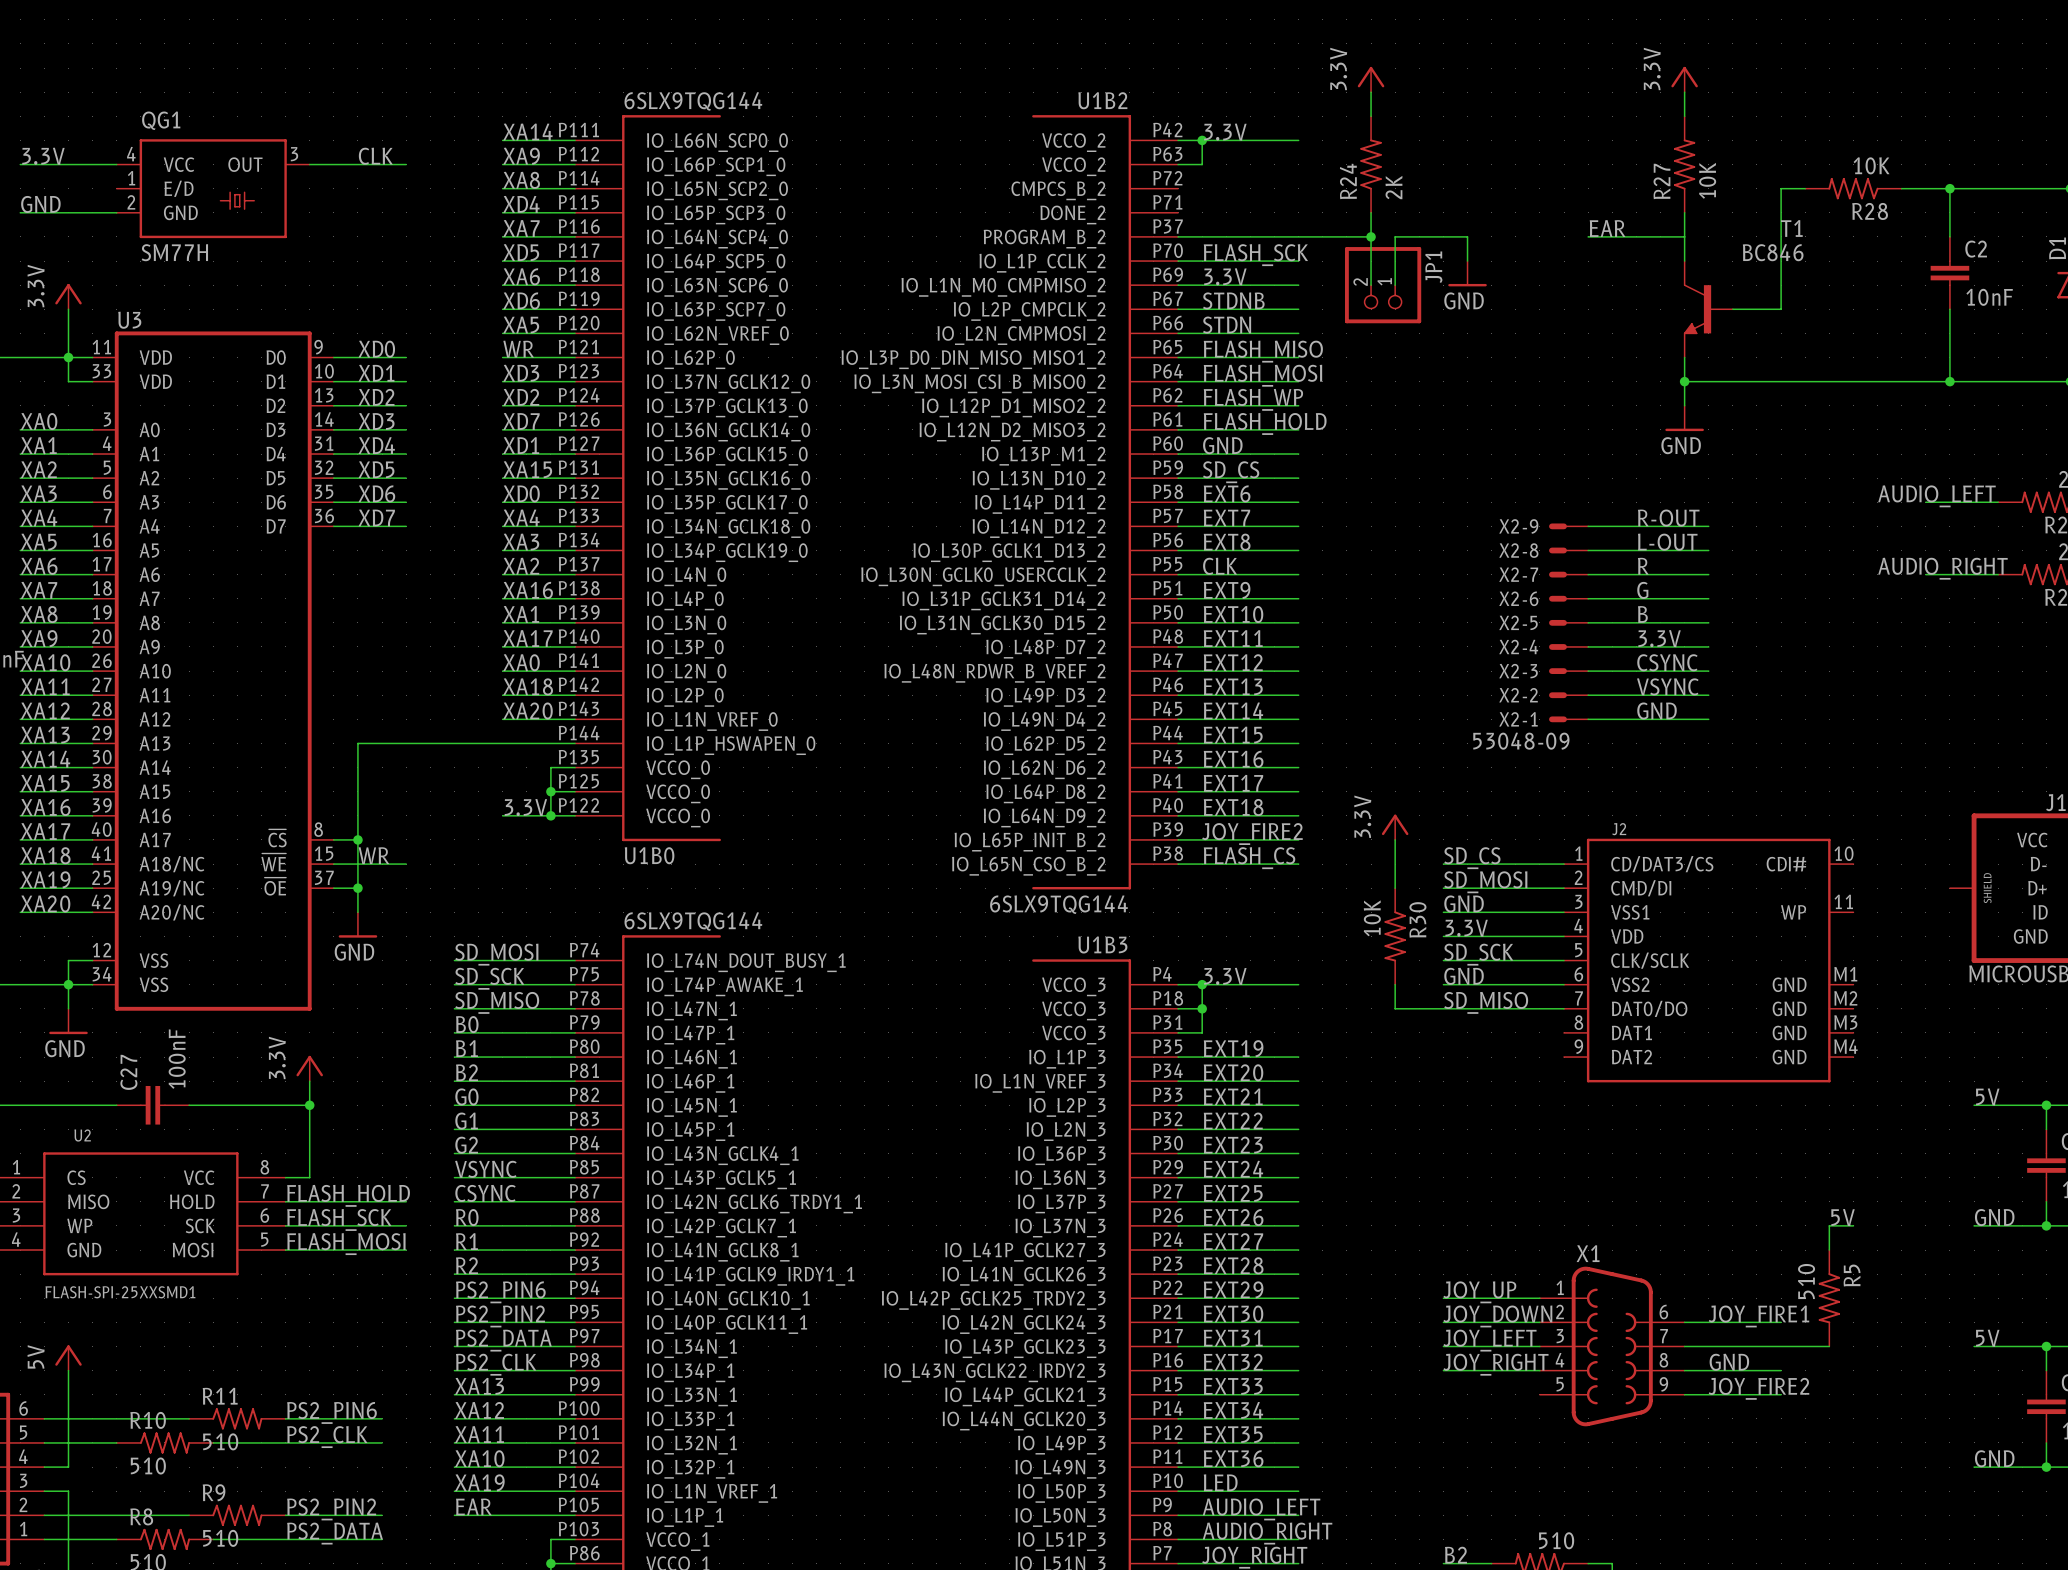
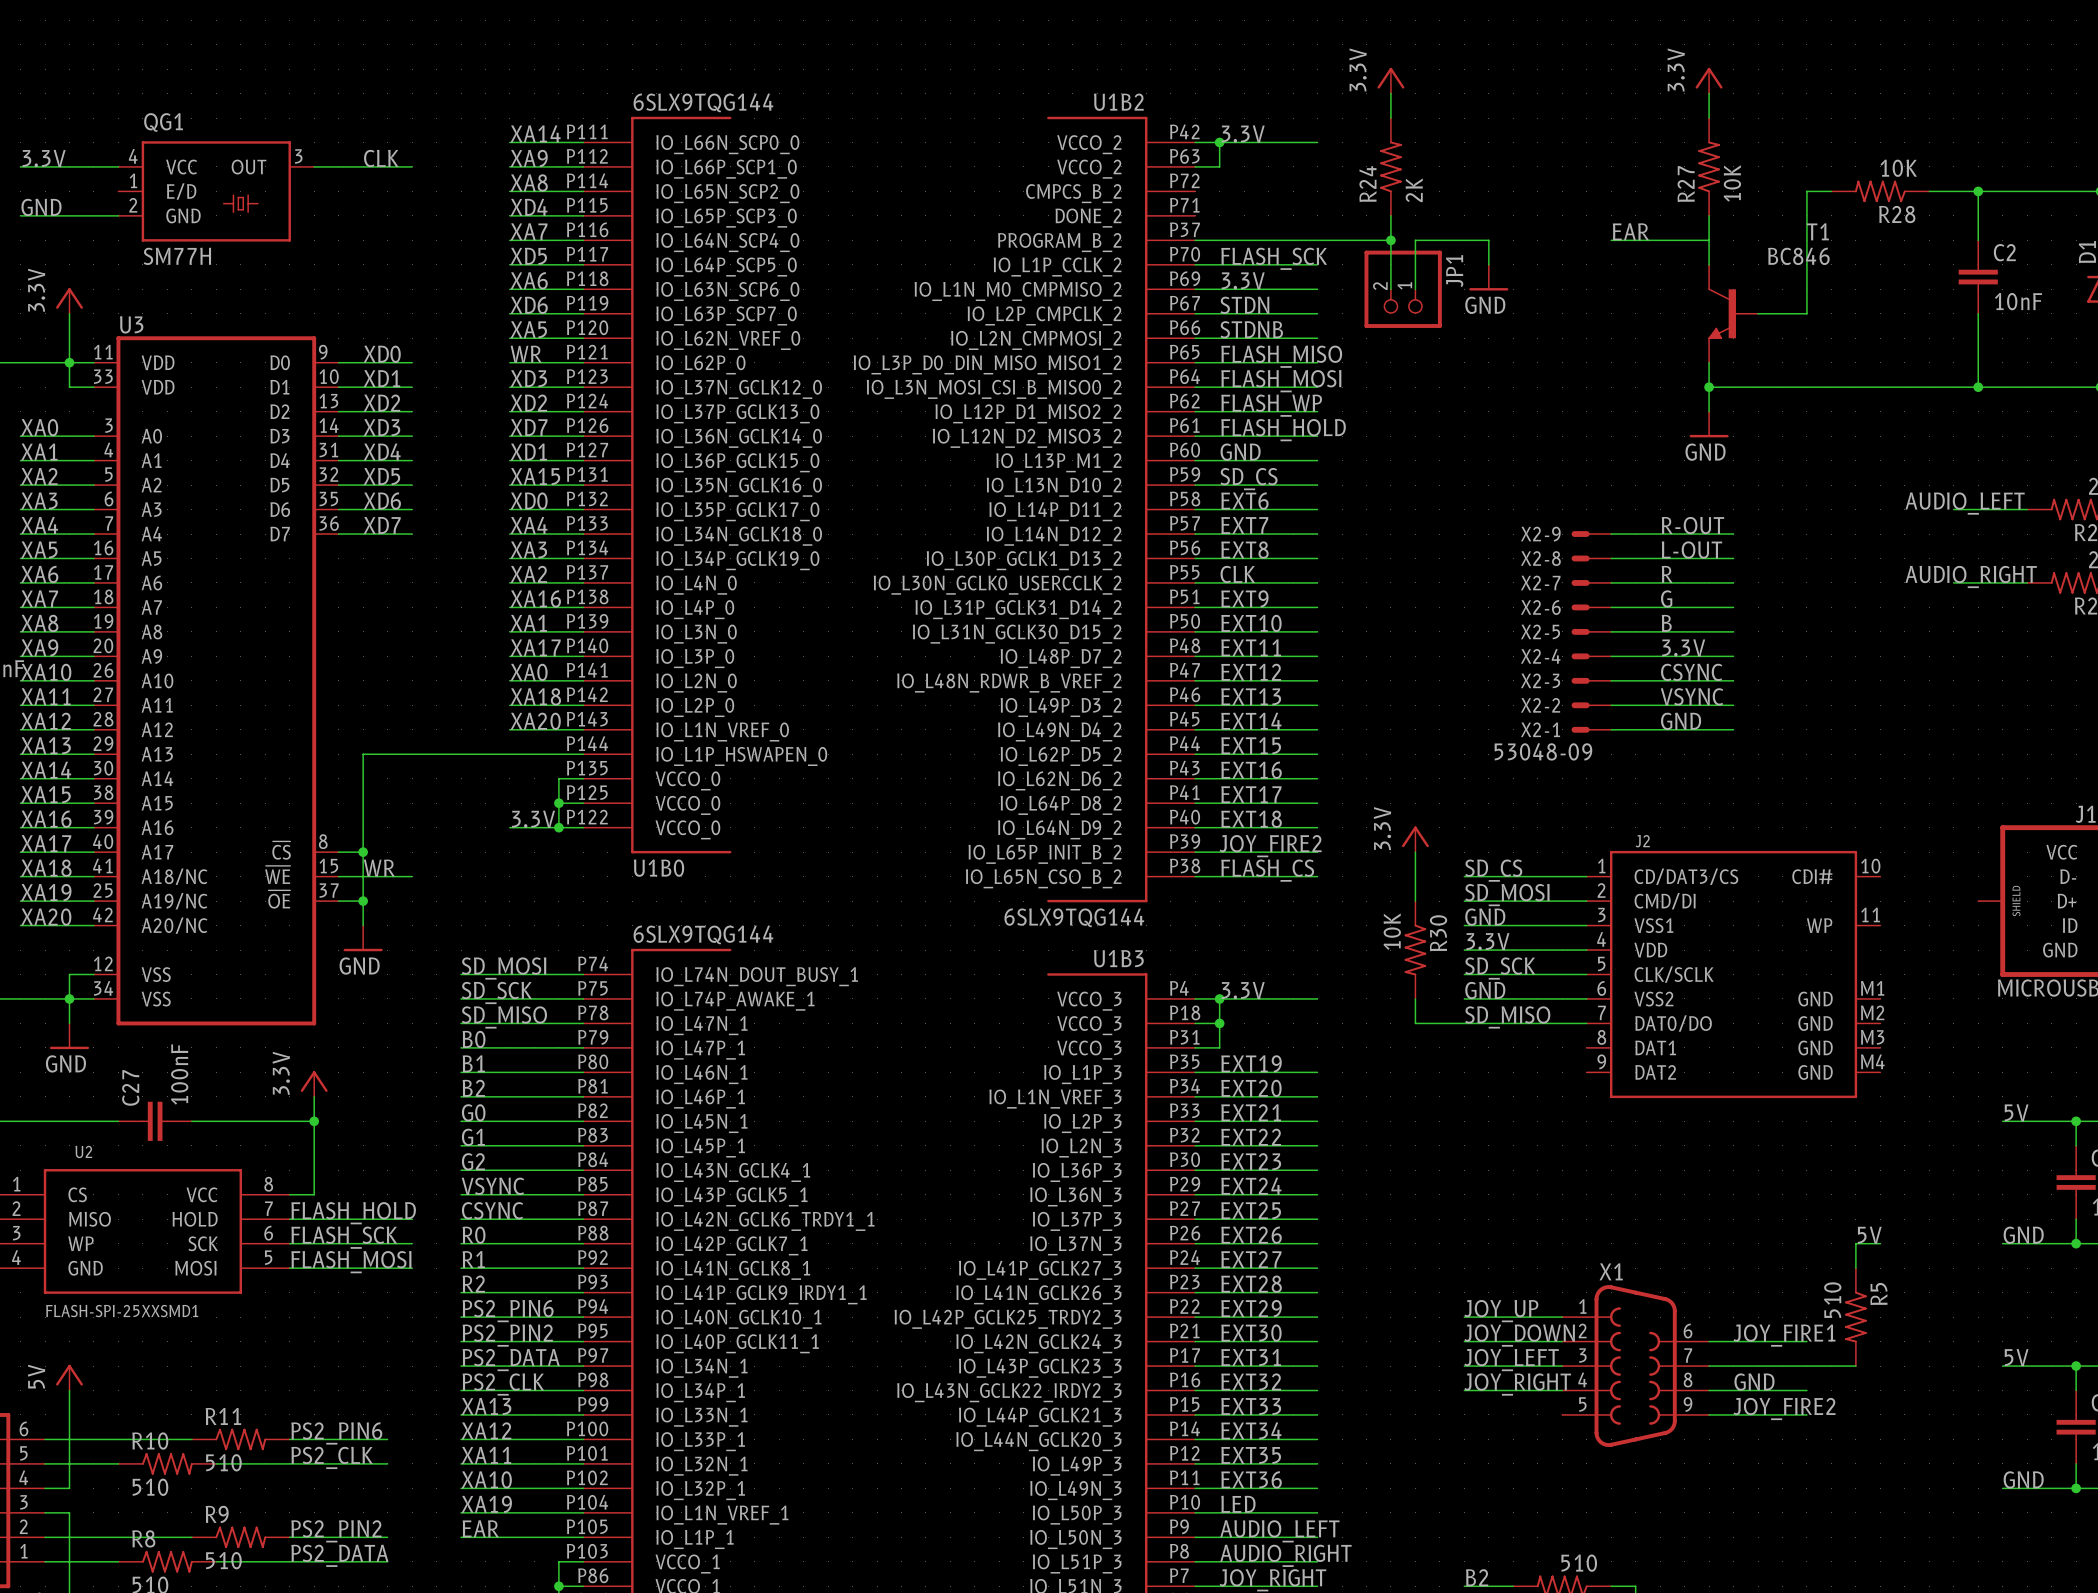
label: STDNB (1233, 300) -> STDN (1244, 305)
label: STDN (1227, 325) -> STDNB (1251, 329)

